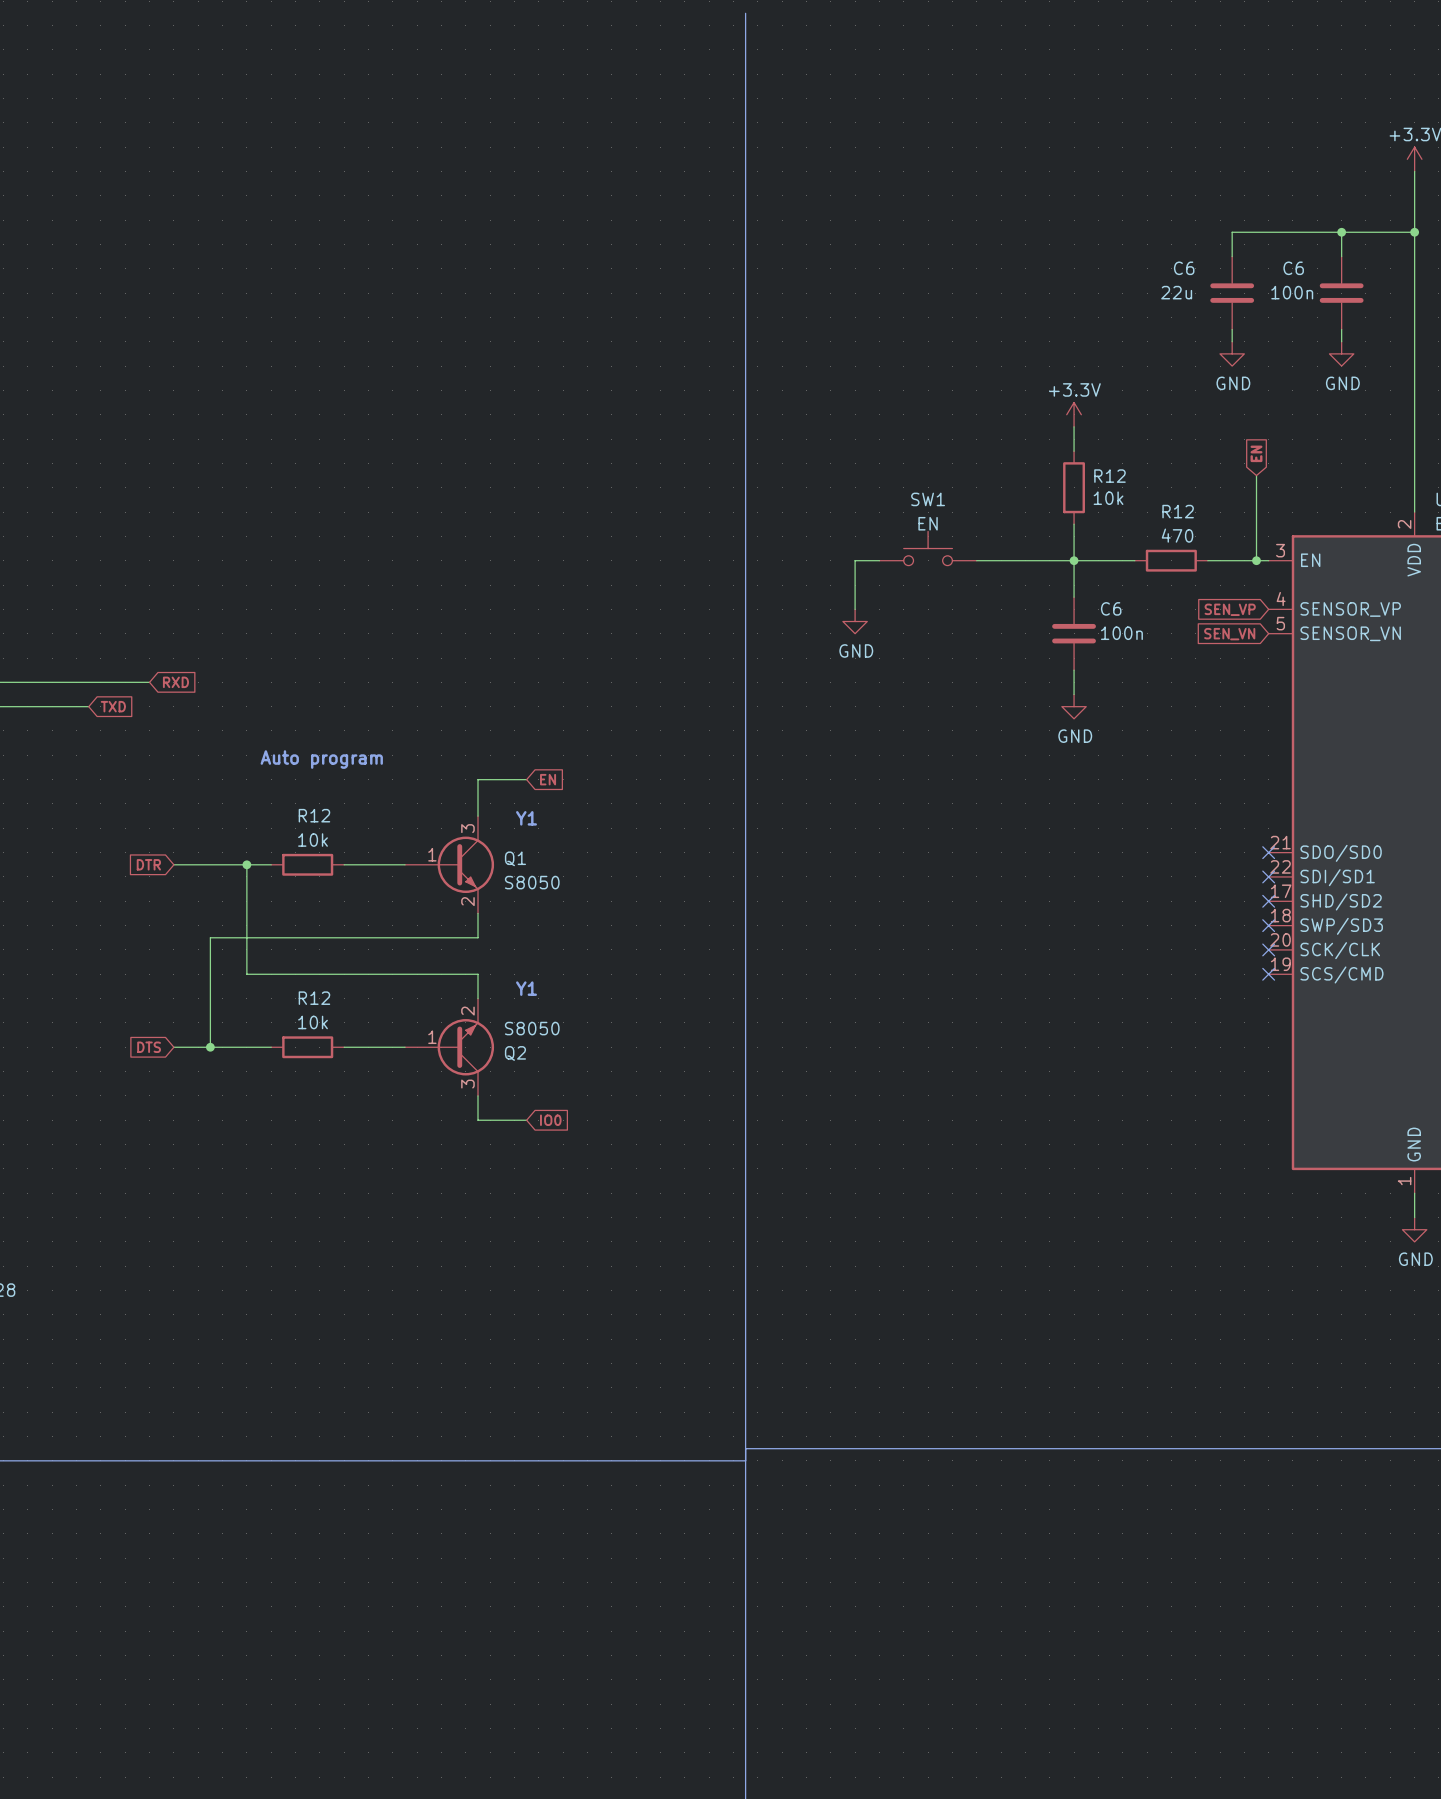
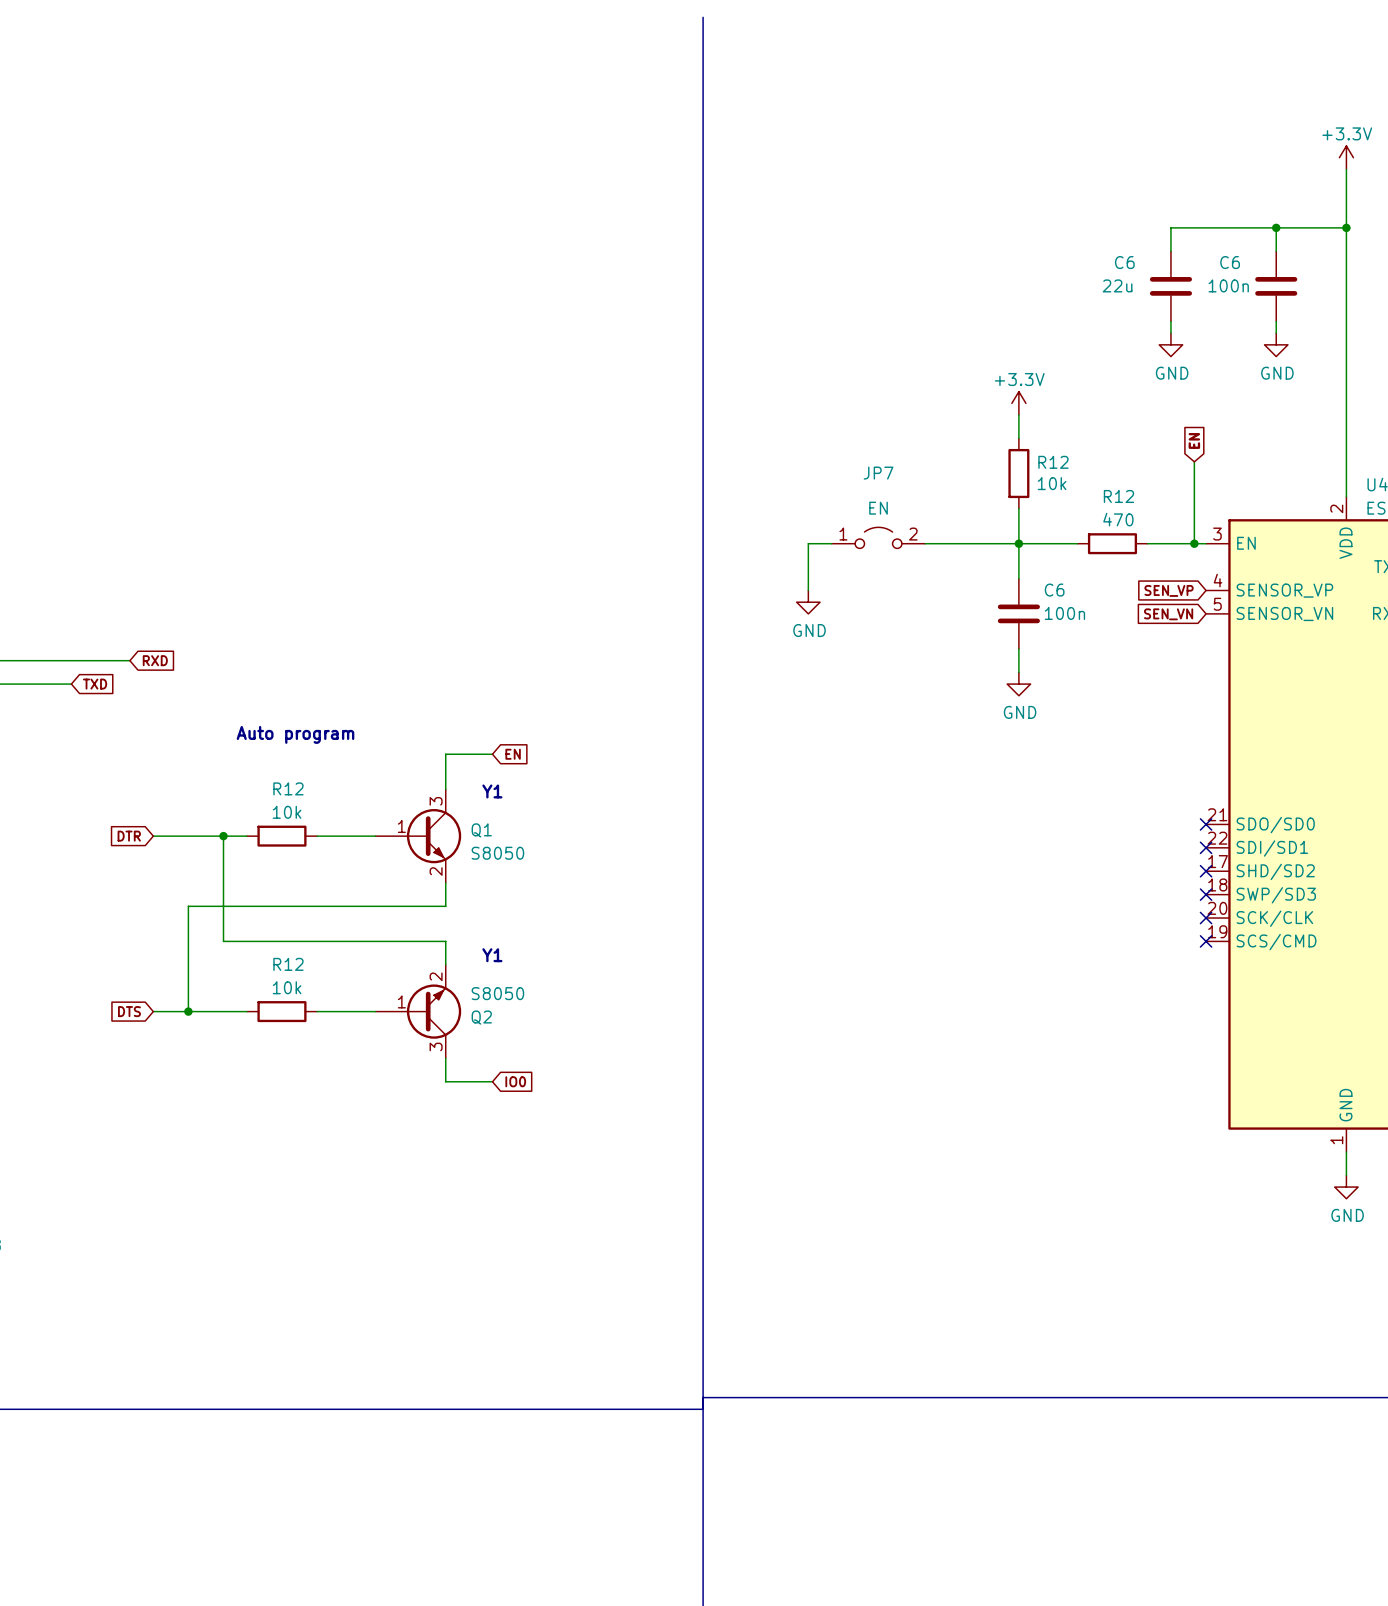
SW1: EN (928, 548) -> none
JP7: none -> EN (878, 537)

